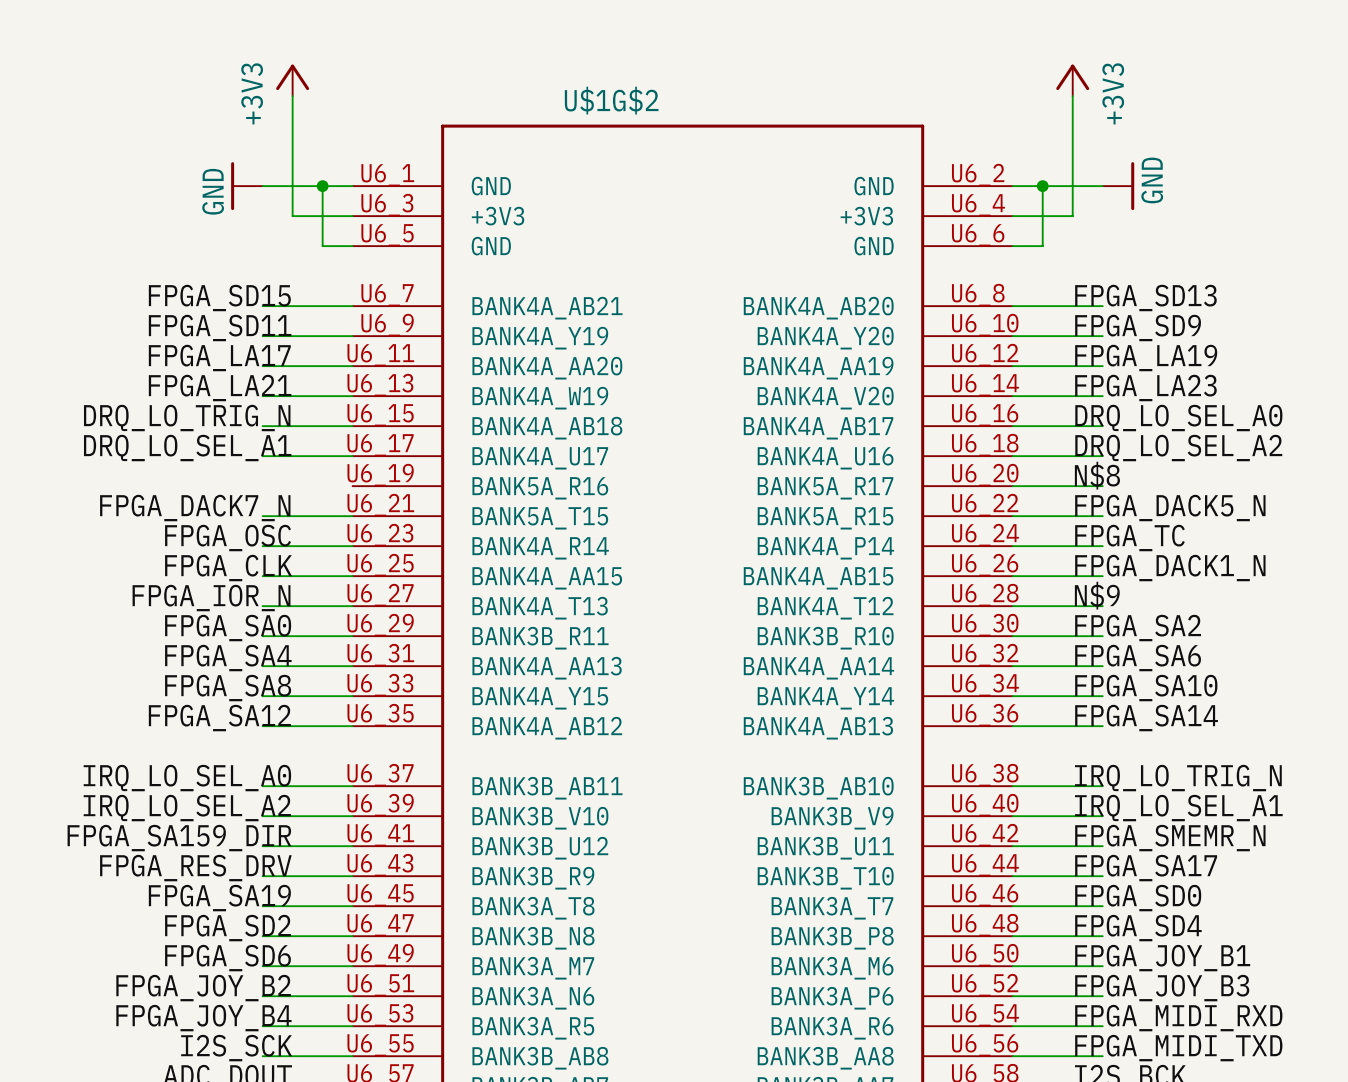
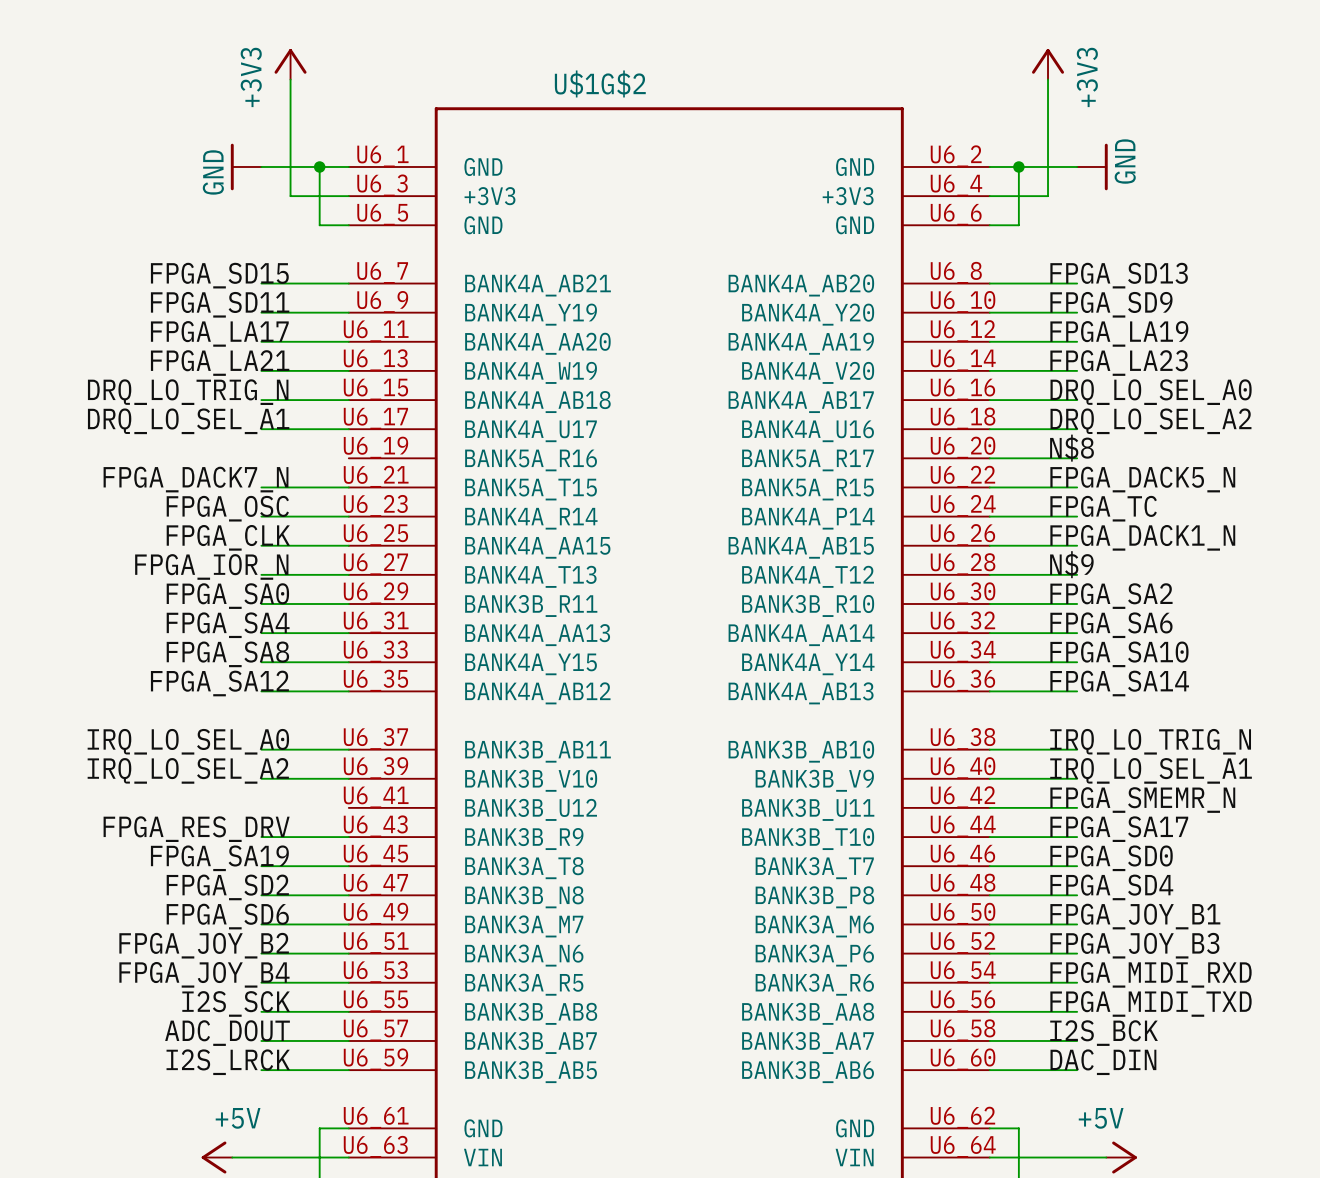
label: FPGA_SA159_DIR (179, 838) -> none
wire: (262, 846) (352, 846) -> none

